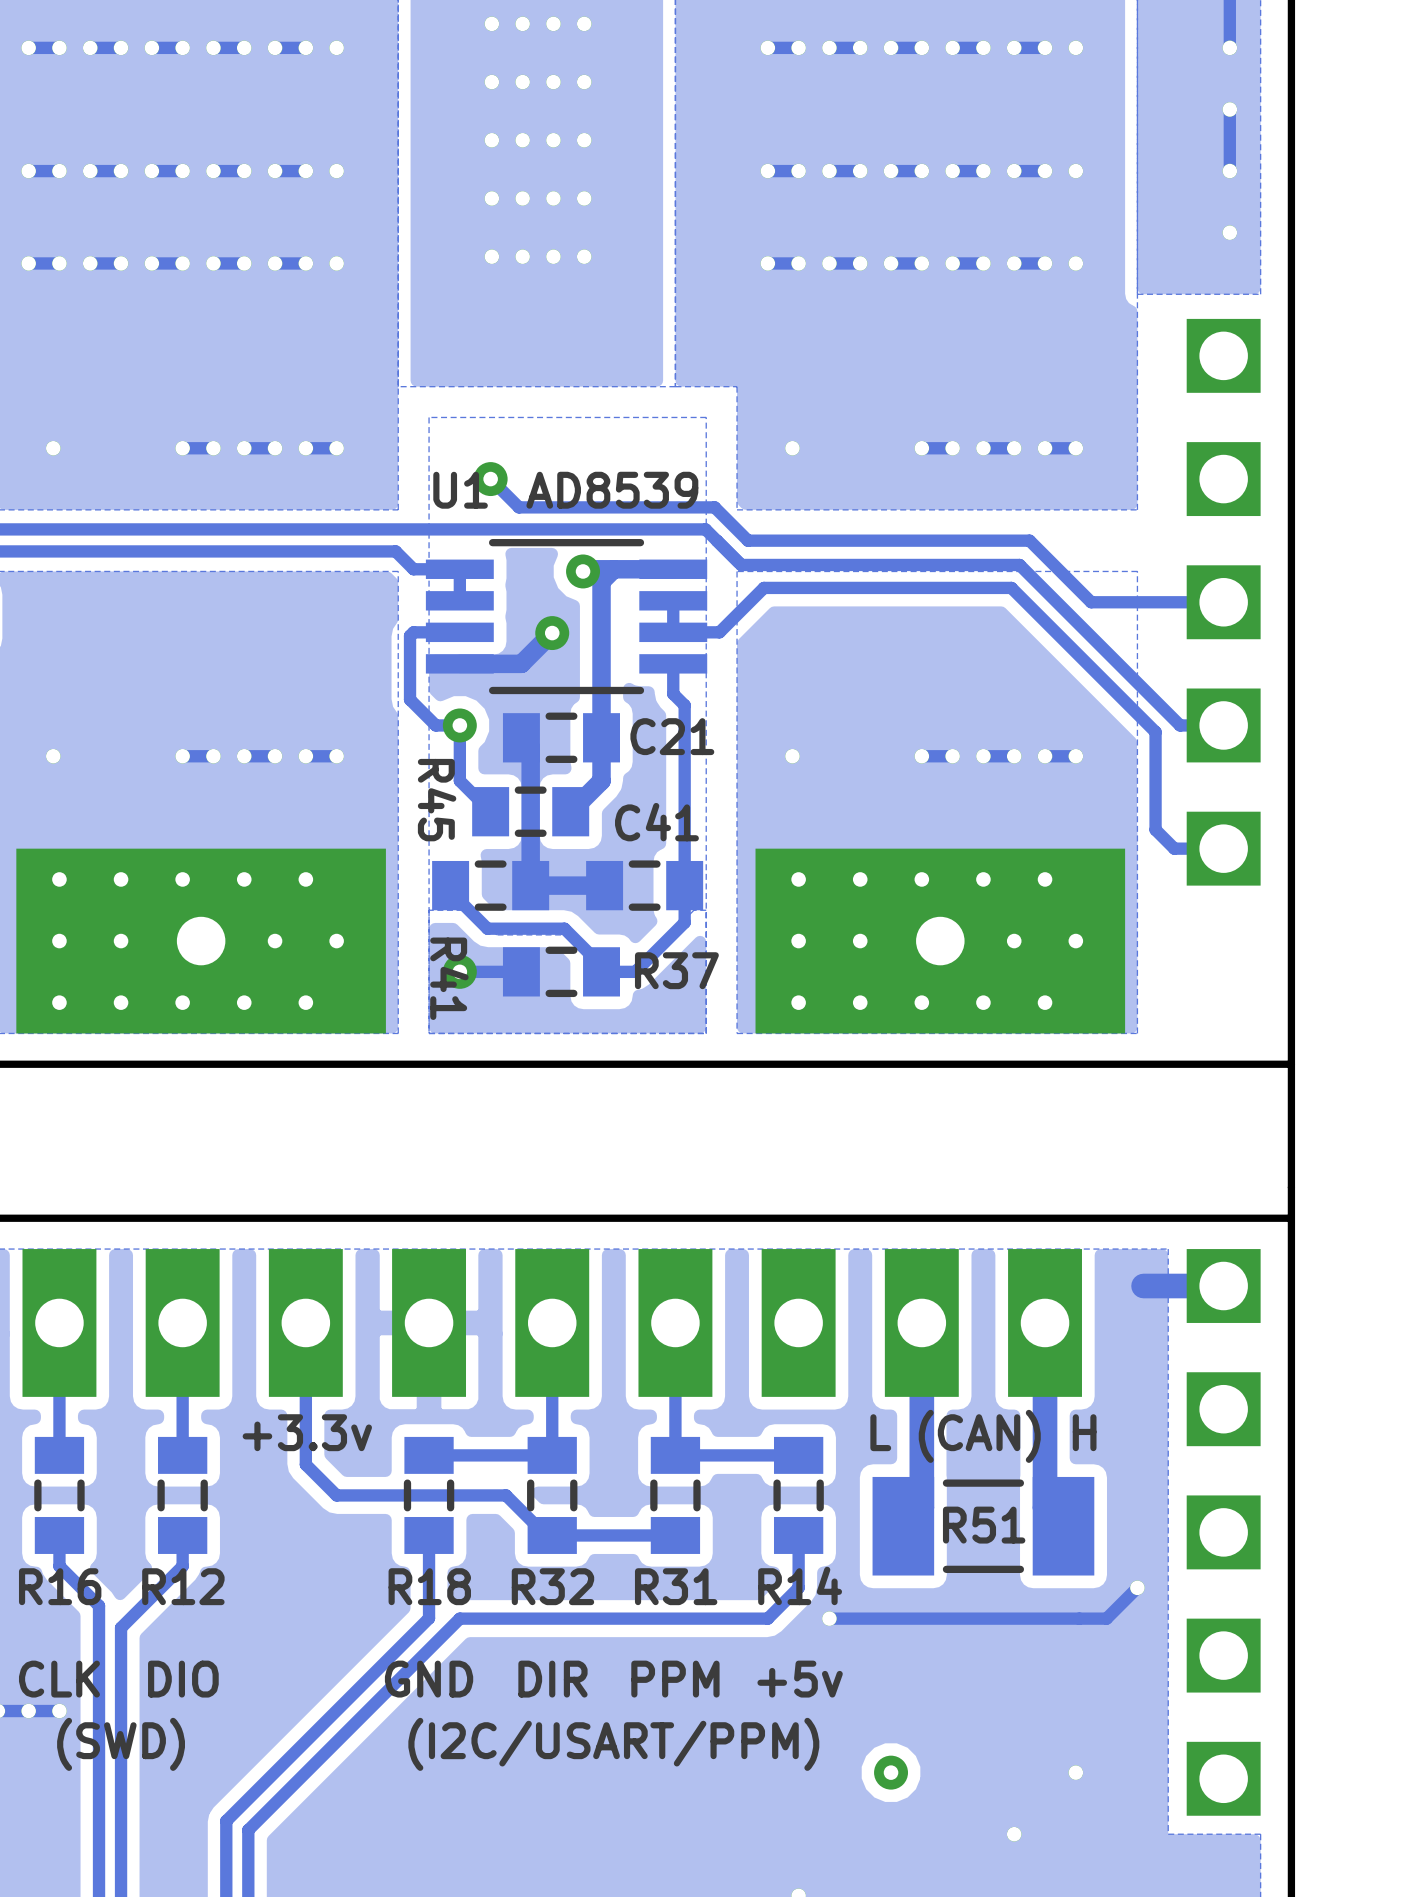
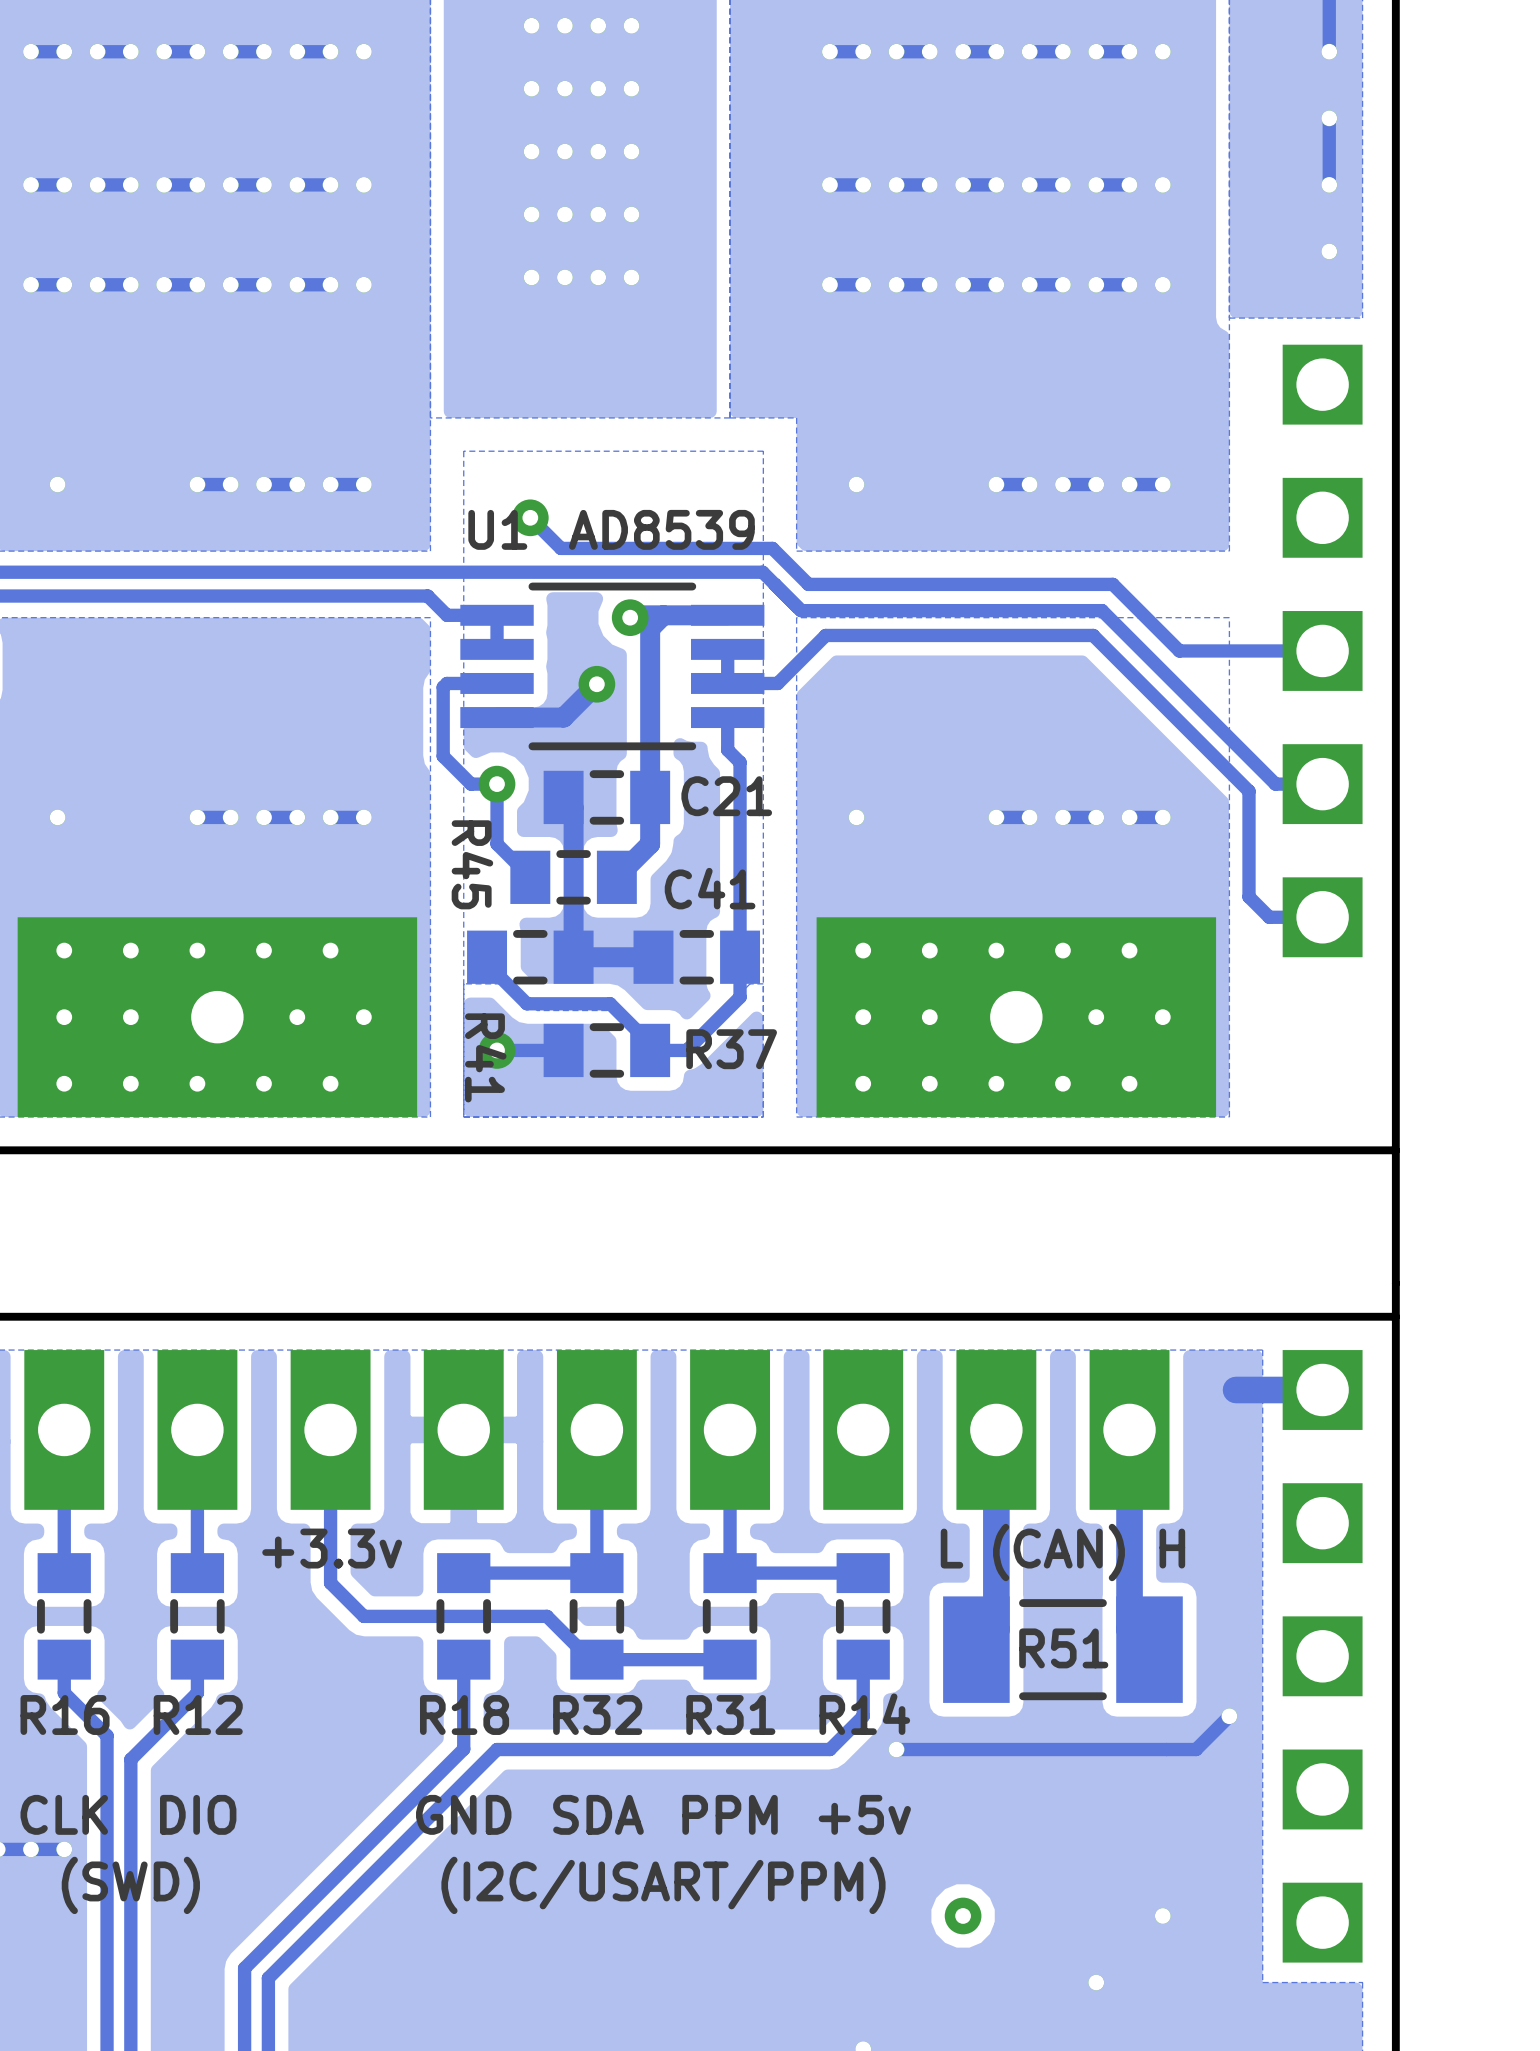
text: DIR (552, 1679) -> SDA (598, 1814)

